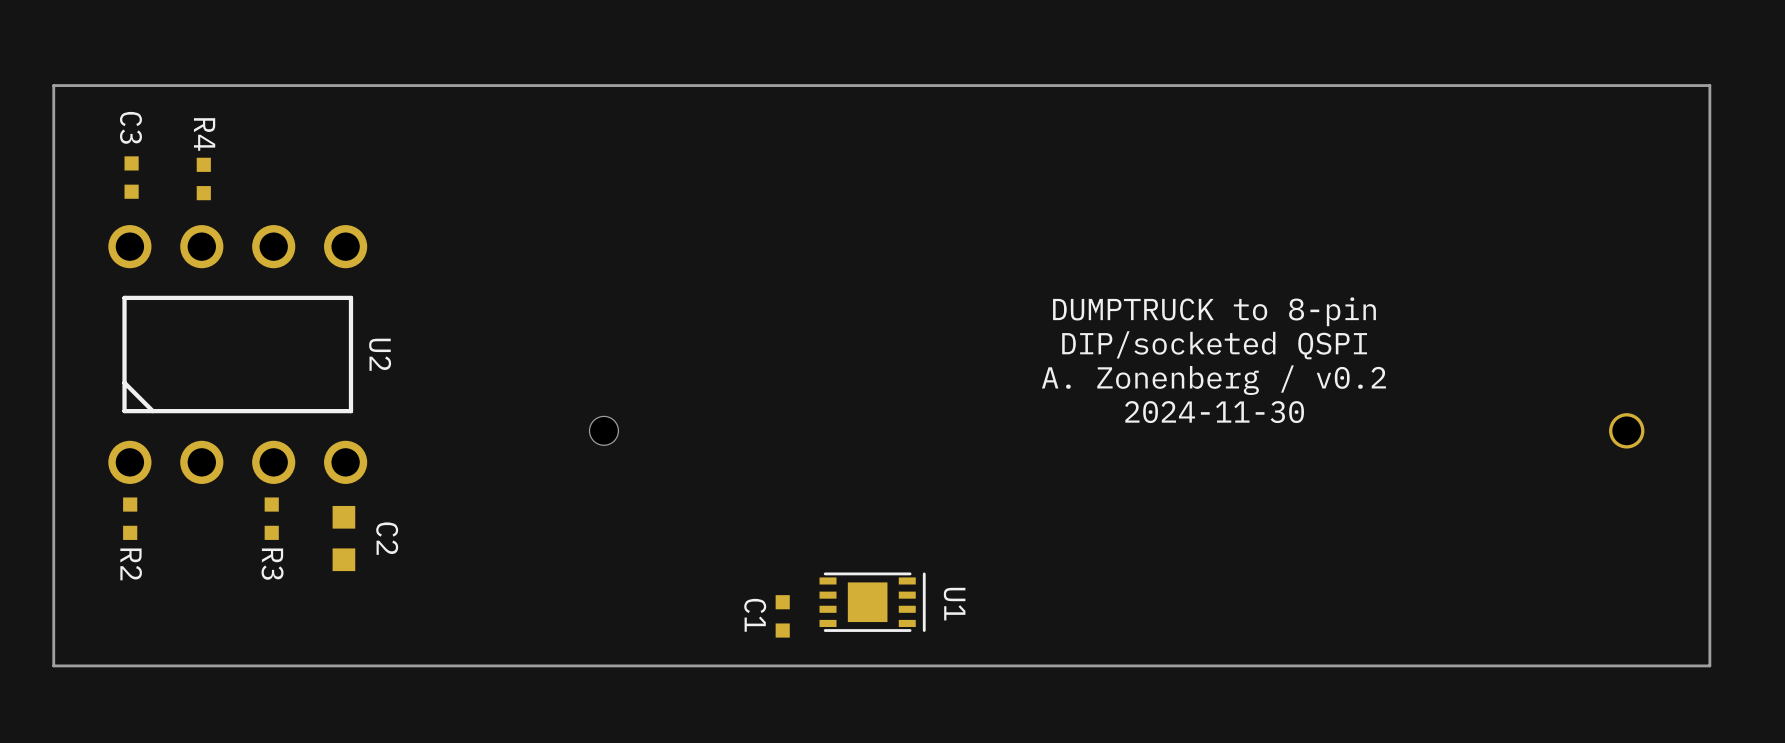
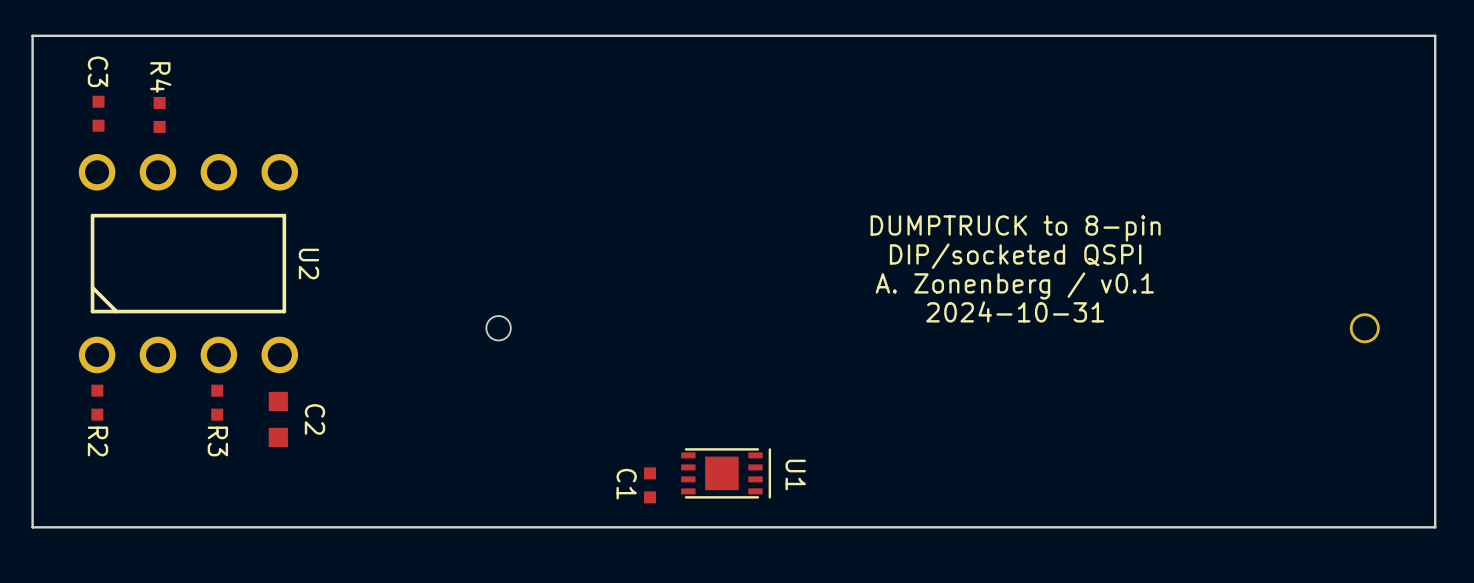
text: A. Zonenberg / v0.2 (1213, 380) -> A. Zonenberg / v0.1 (1014, 285)
text: 2024-11-30 (1214, 412) -> 2024-10-31 (1015, 311)

